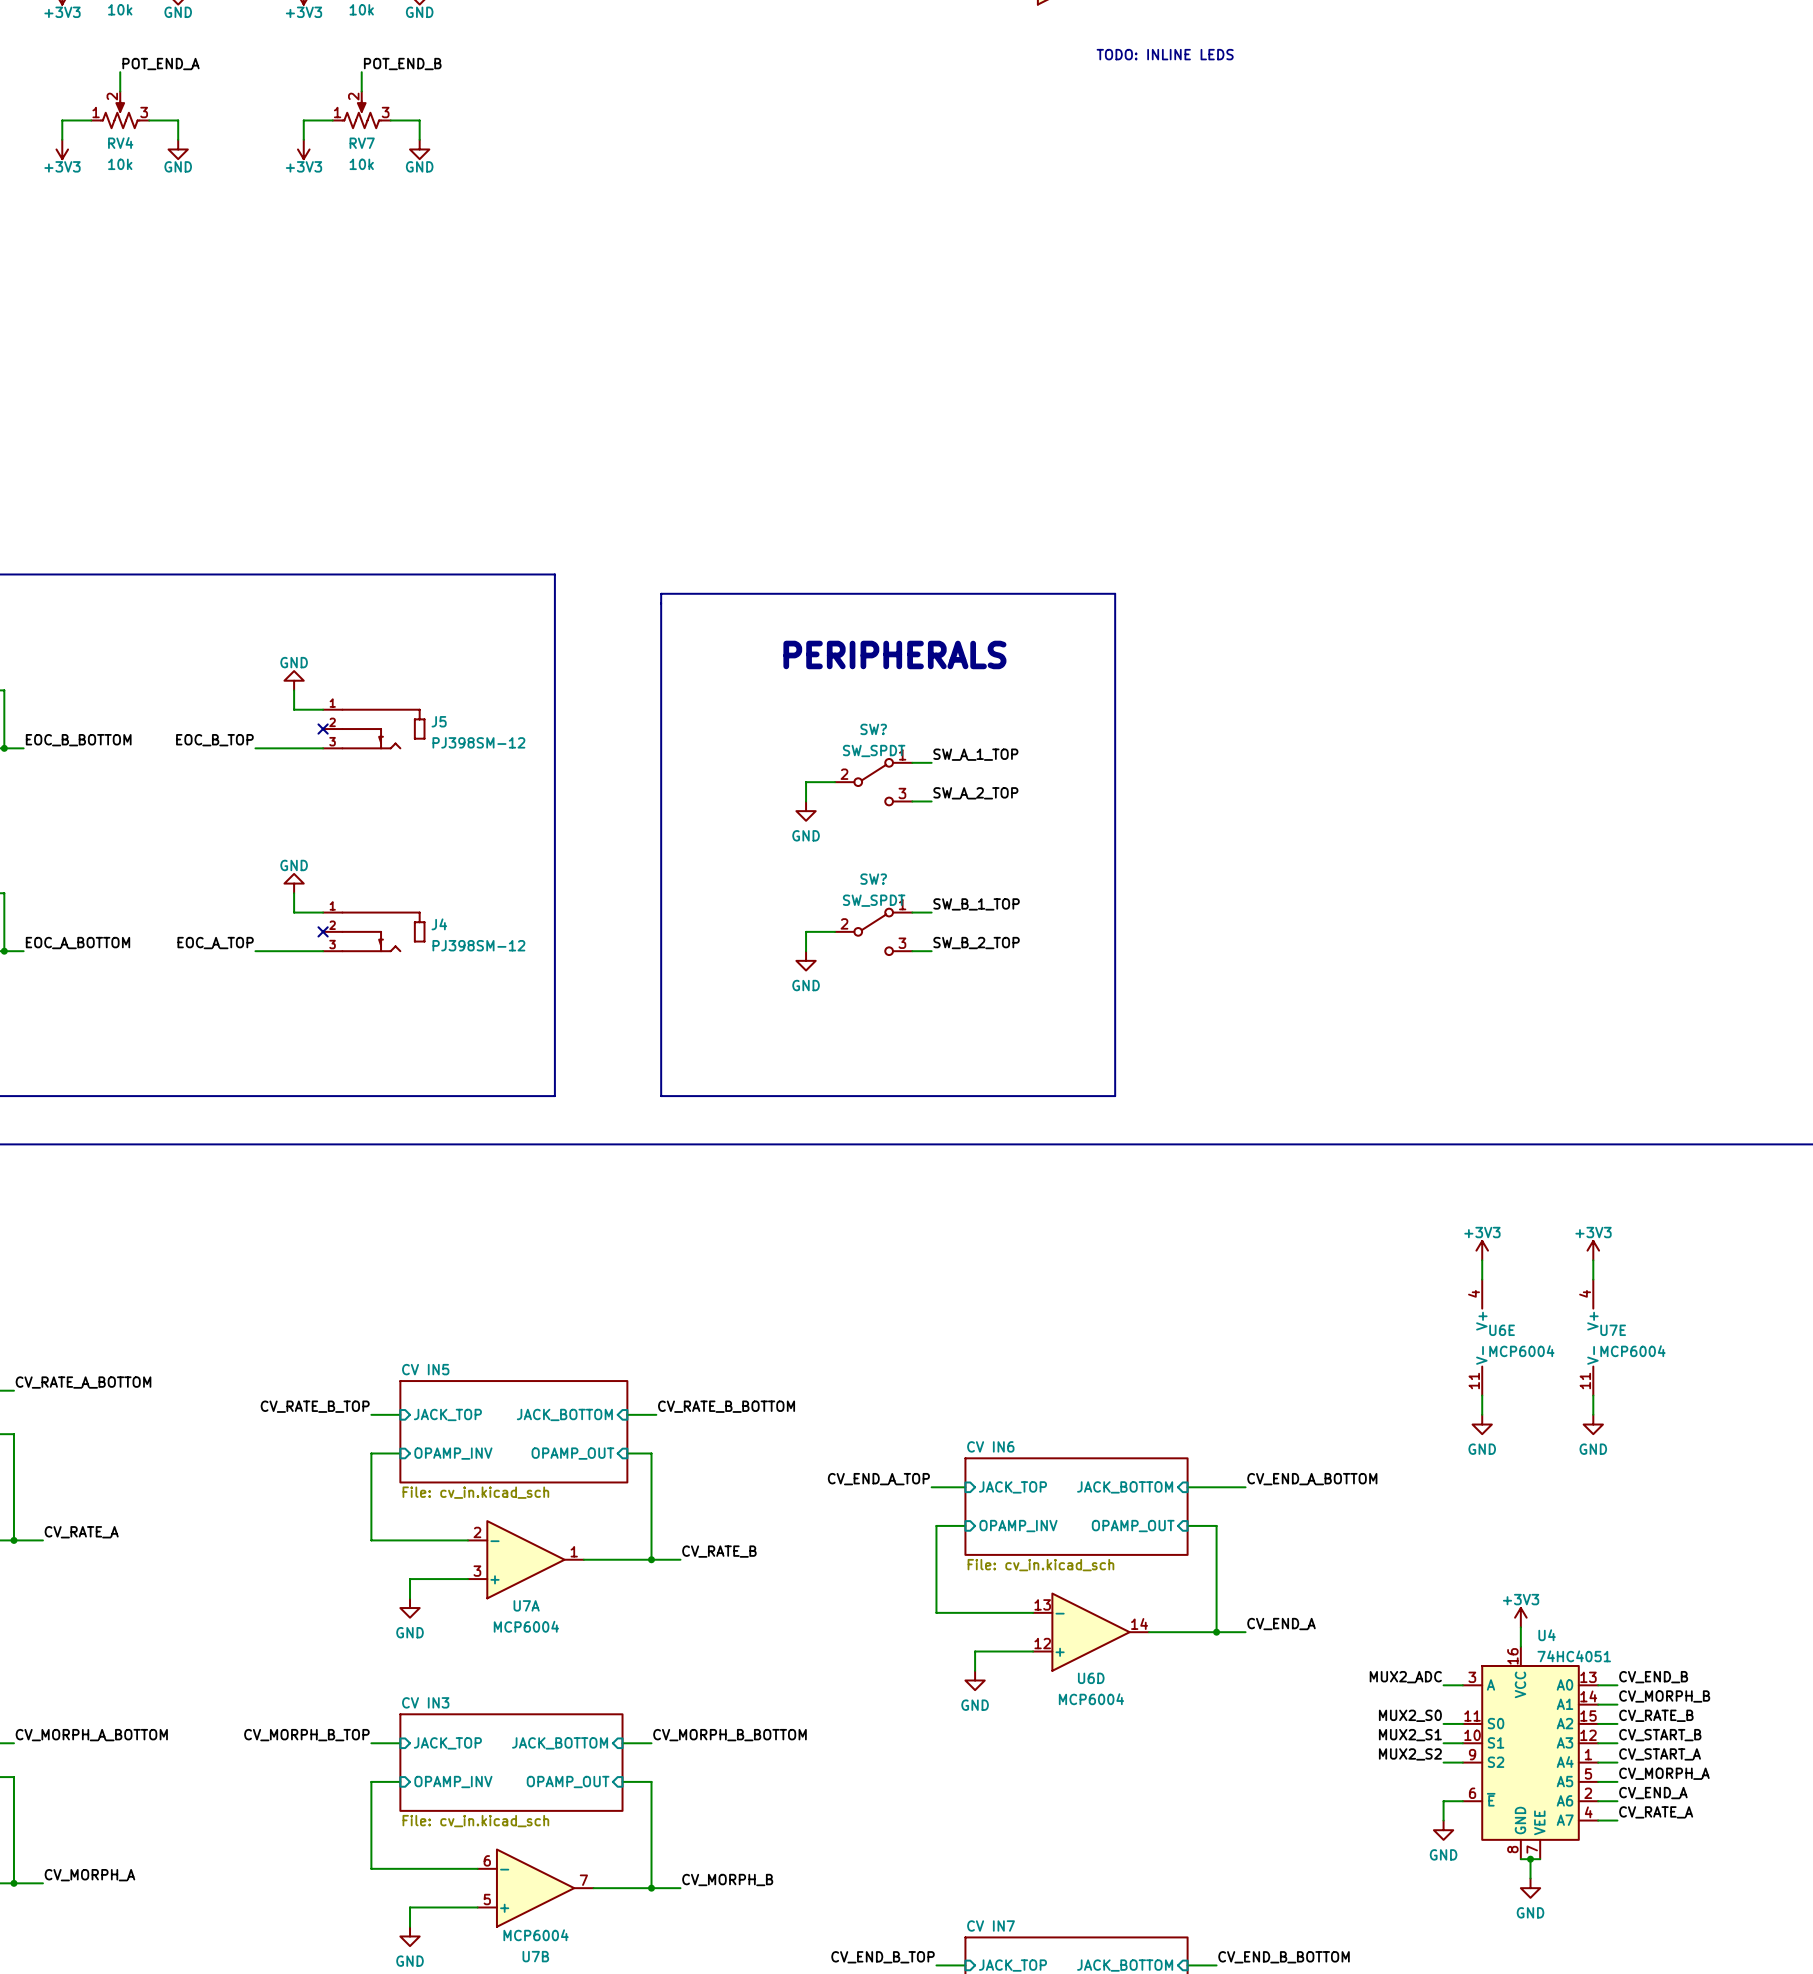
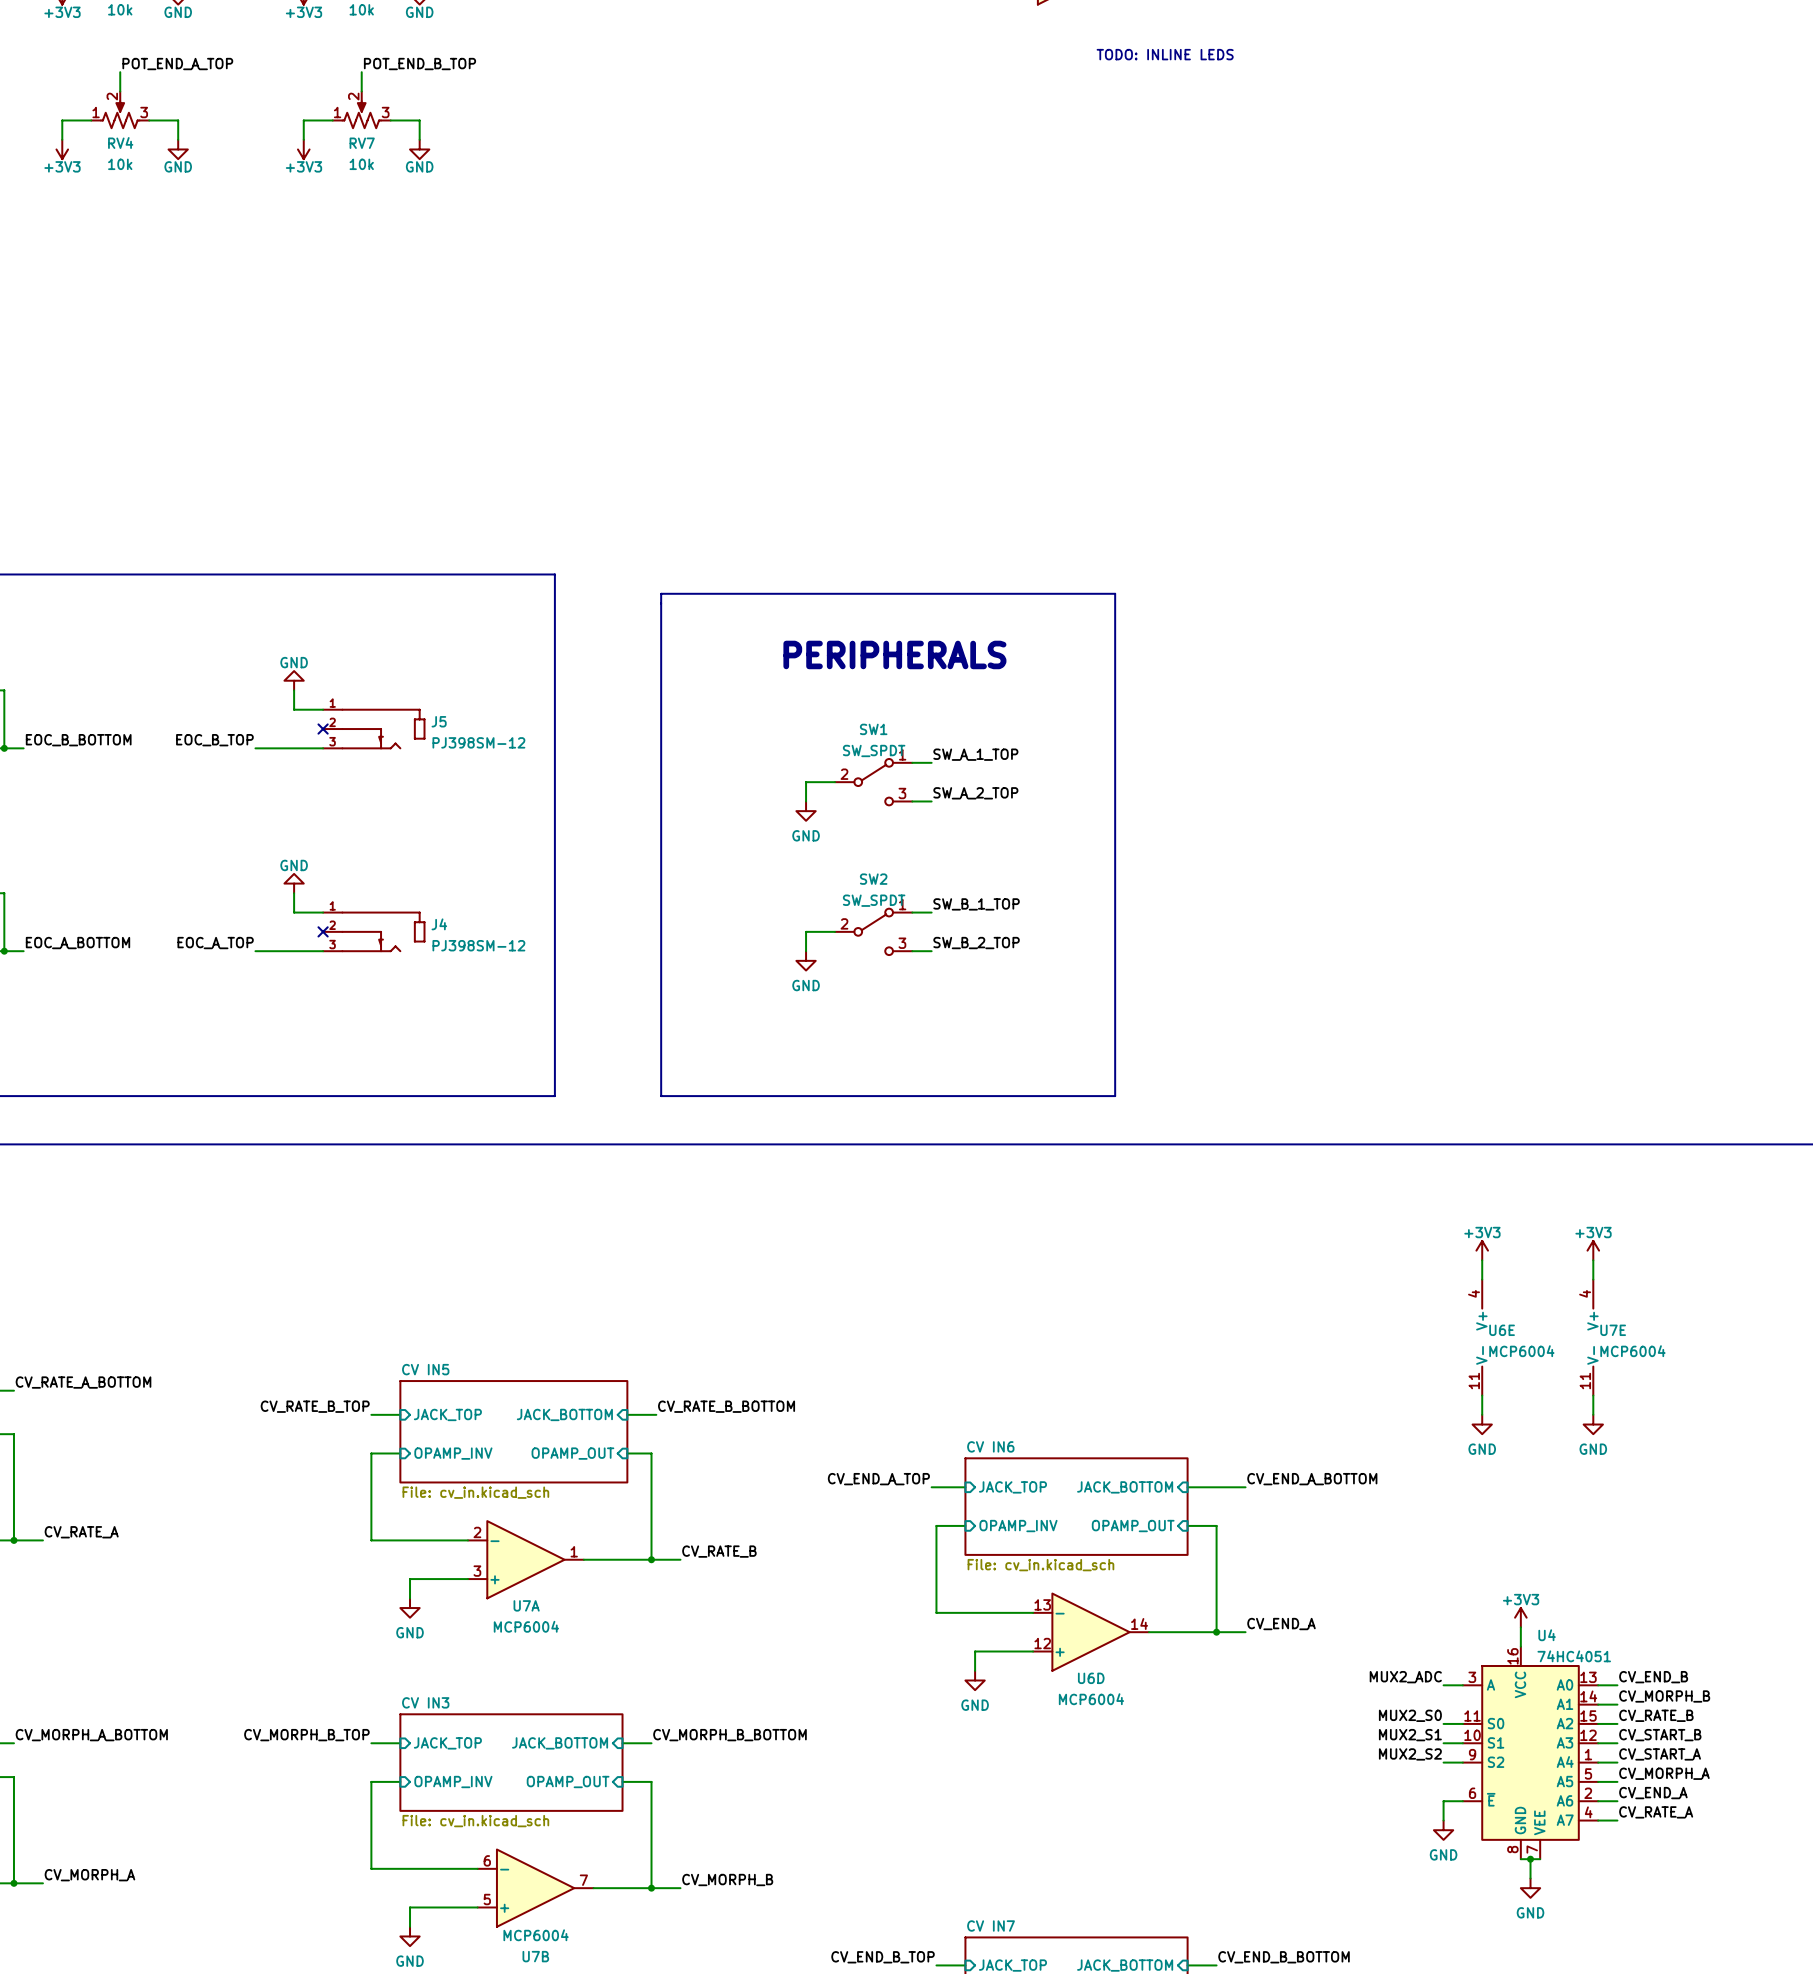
label: POT_END_A (161, 64) -> POT_END_A_TOP (177, 64)
label: POT_END_B (402, 64) -> POT_END_B_TOP (419, 64)
SW? name: SW? (873, 729) -> SW1 (873, 729)
SW? name: SW? (873, 879) -> SW2 (873, 879)

